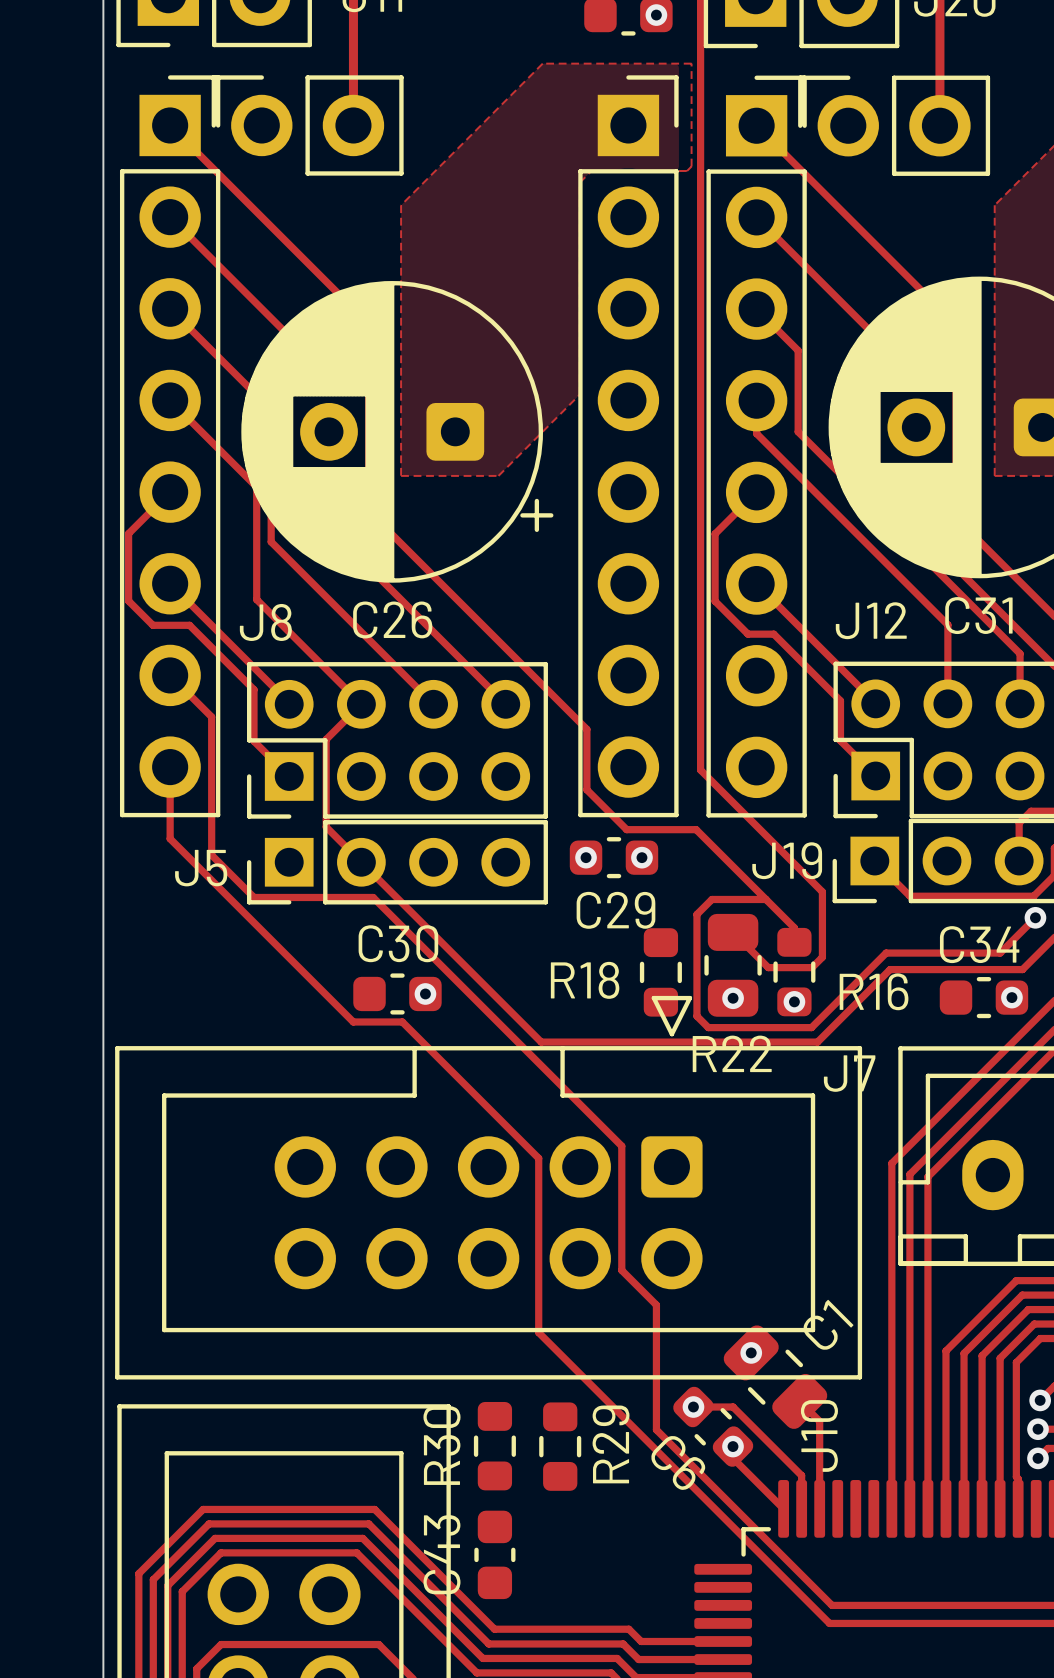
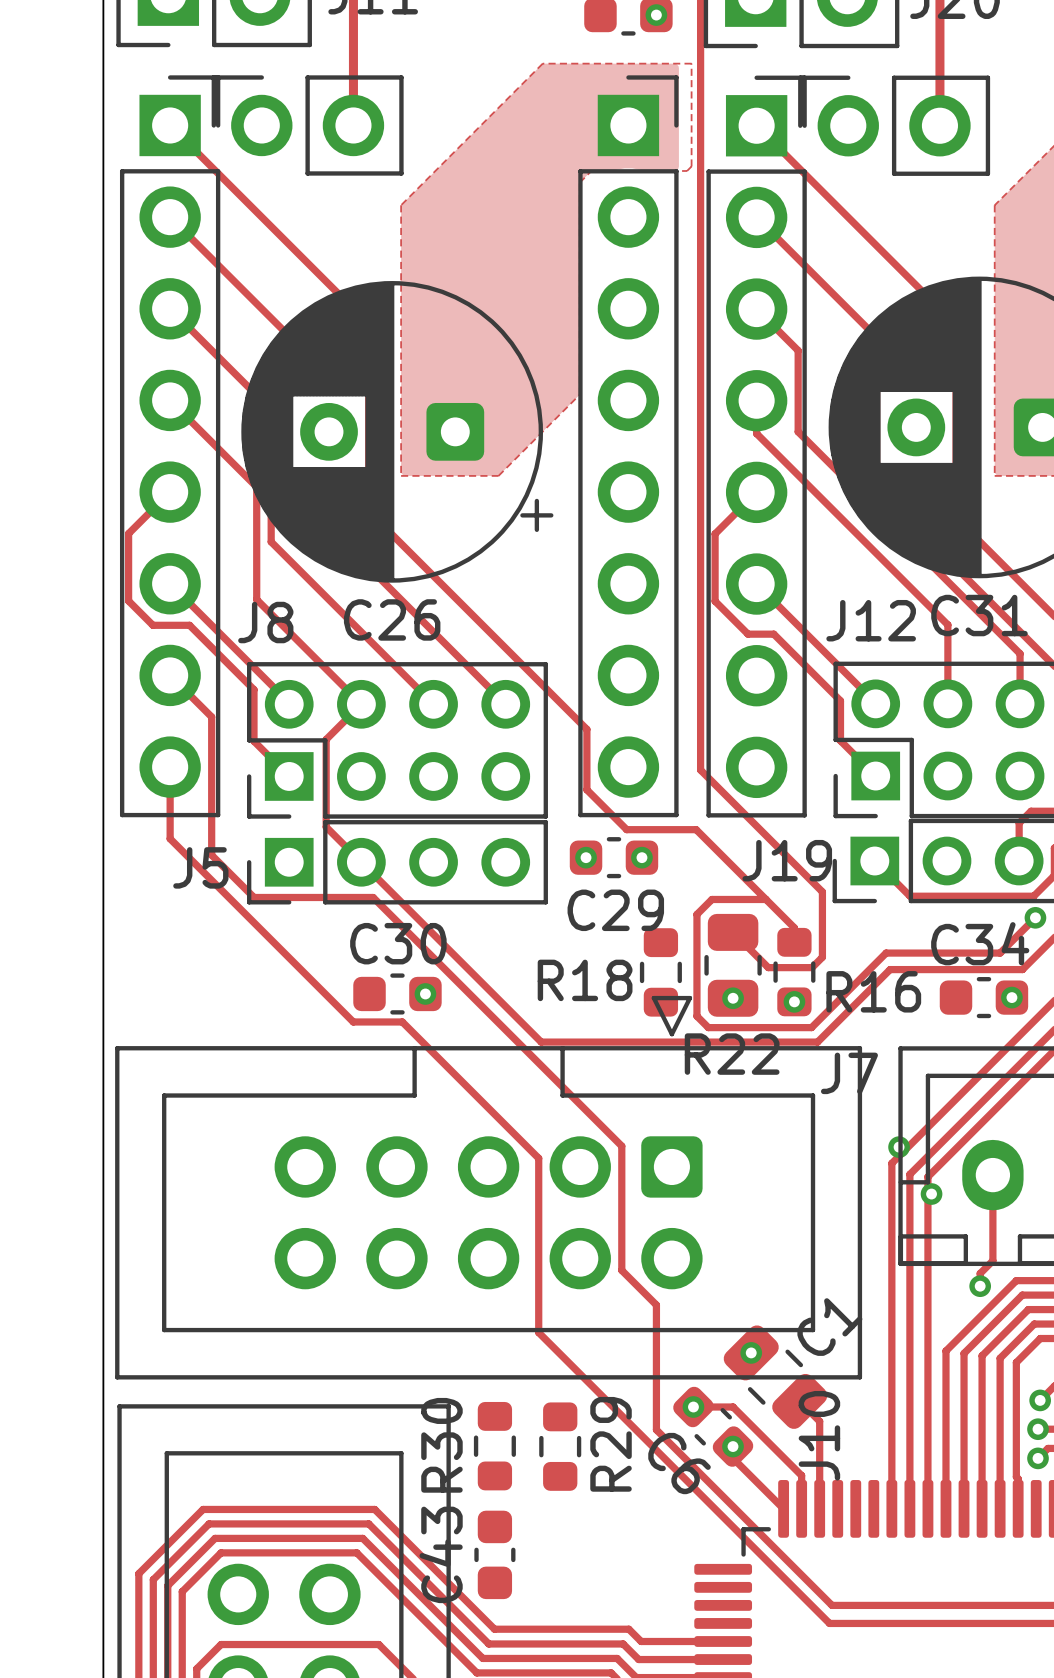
via: none -> (899, 1147)
track: none -> (992, 1175) (992, 1260) (980, 1273) (980, 1286)
via: none -> (931, 1194)
via: none -> (980, 1286)

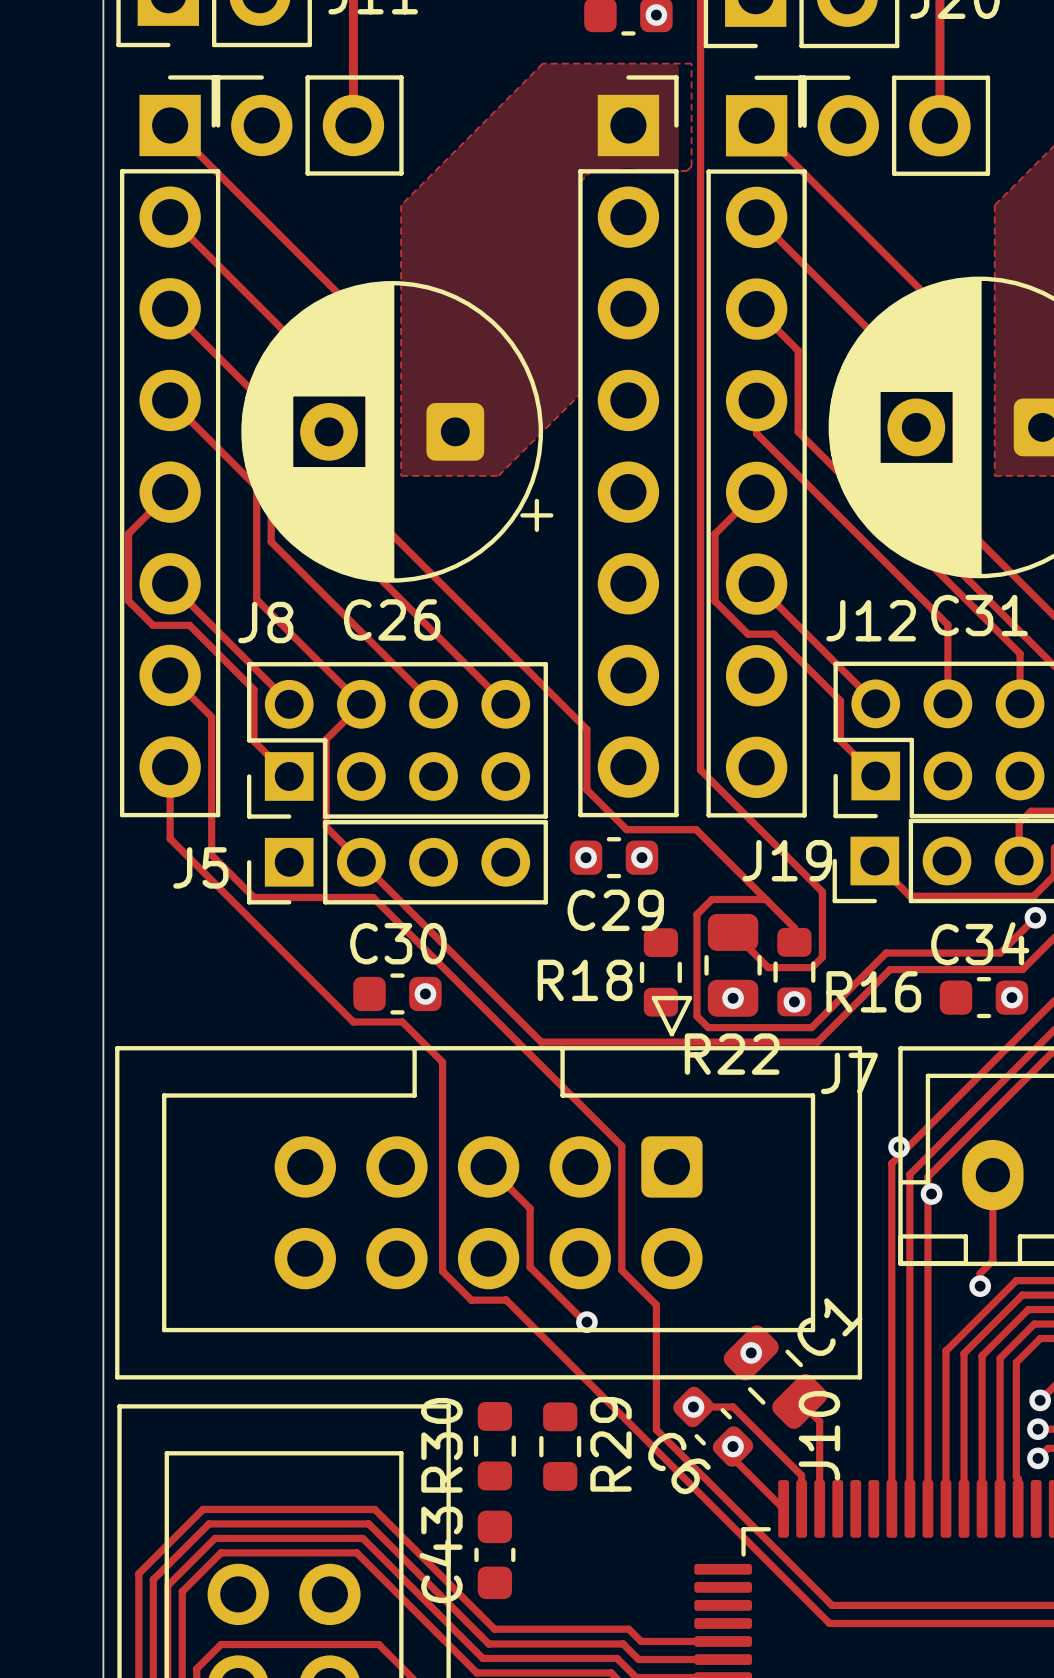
track: (442, 1062) (538, 1158) (538, 1332) -> (442, 1062) (442, 1271) (471, 1300) (505, 1300)
track: none -> (488, 1166) (530, 1208) (530, 1267) (586, 1322)
track: none -> (506, 1299) (538, 1332)
via: none -> (586, 1322)

